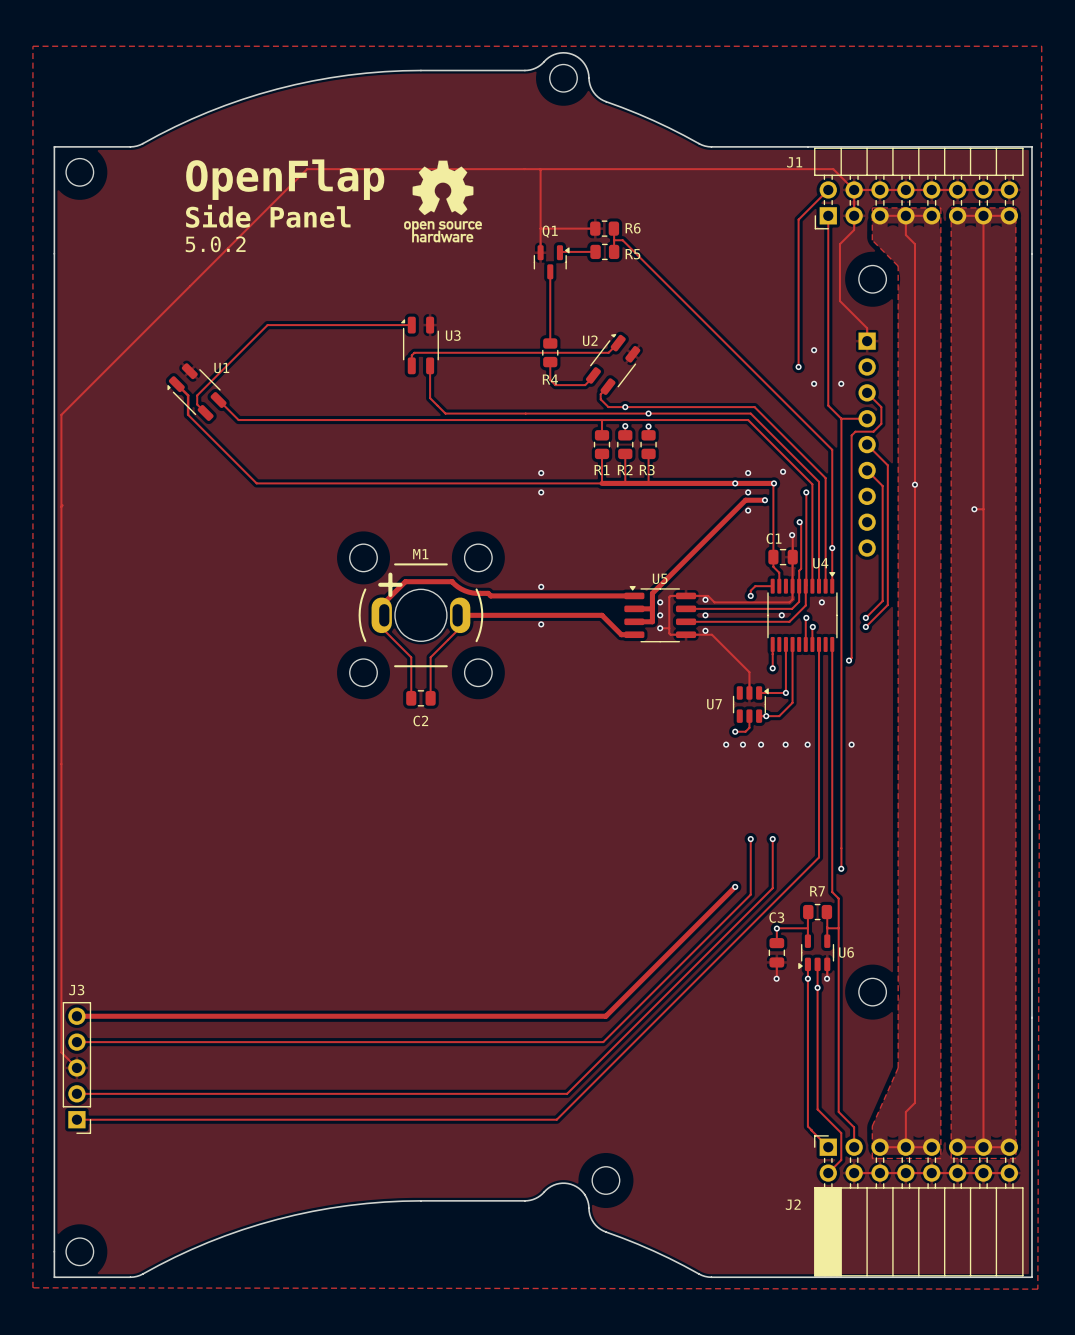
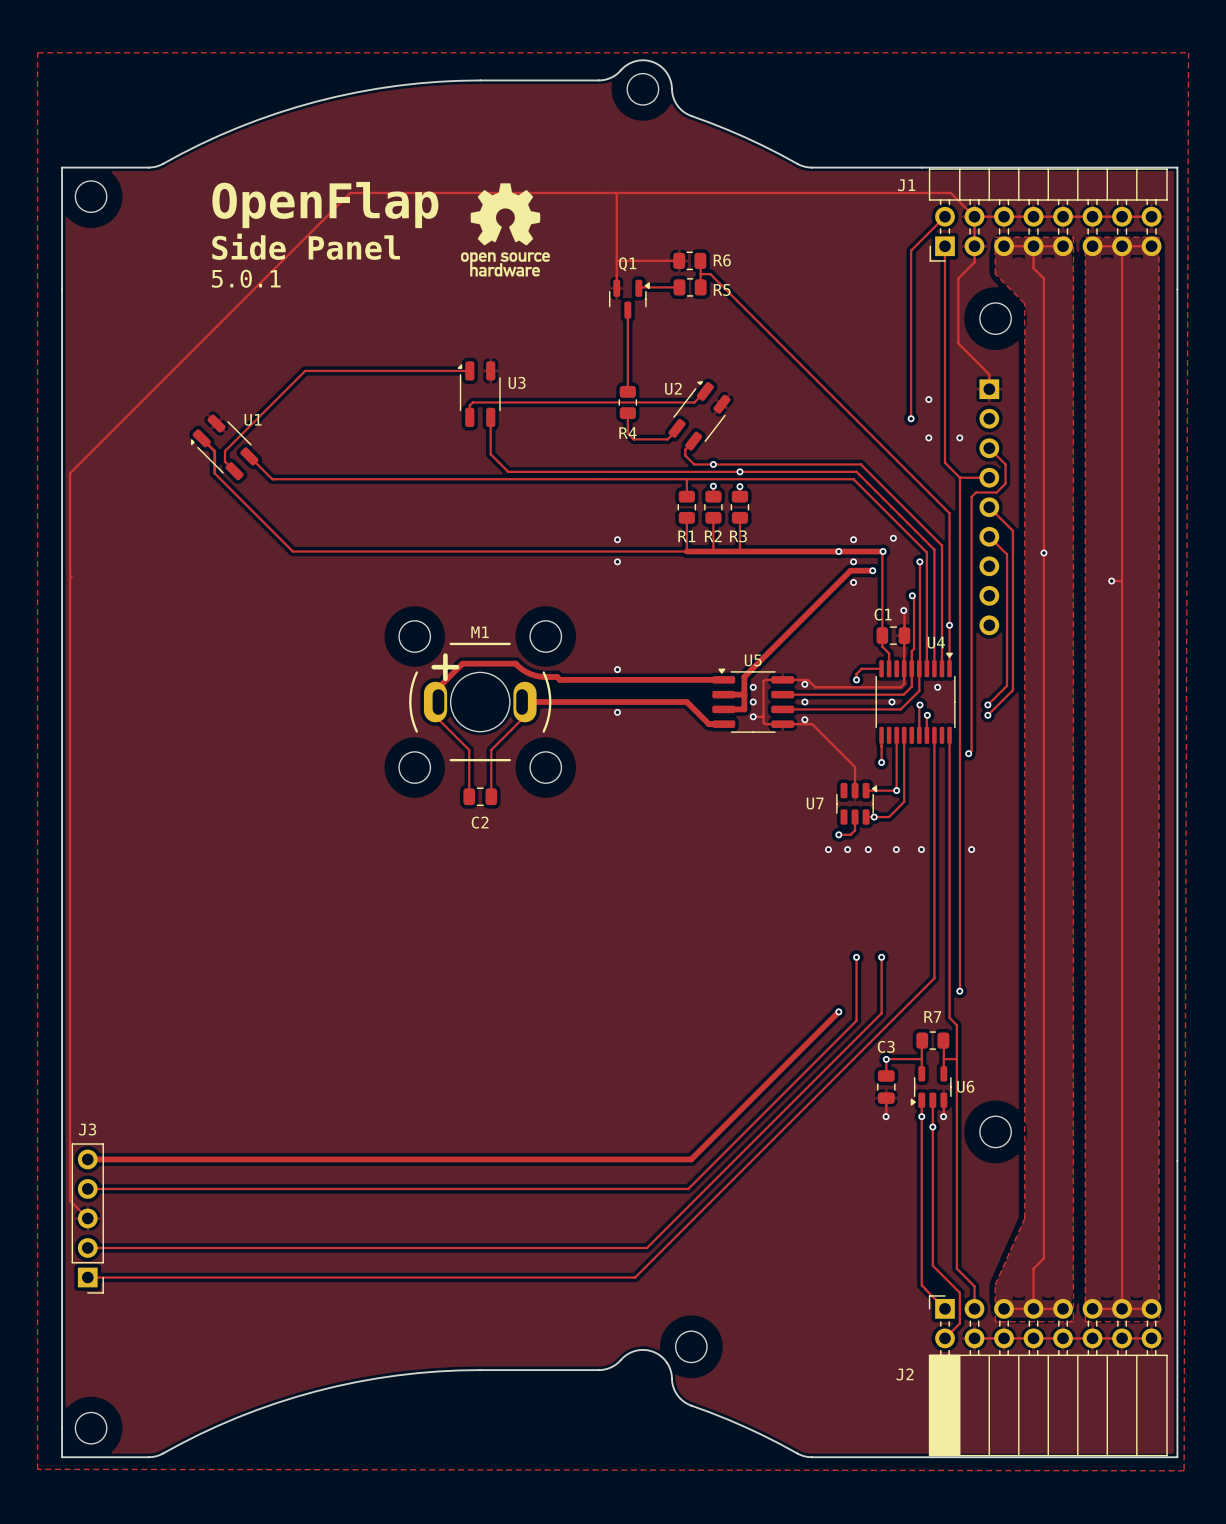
text: 5.0.2 (215, 244) -> 5.0.1 (246, 278)

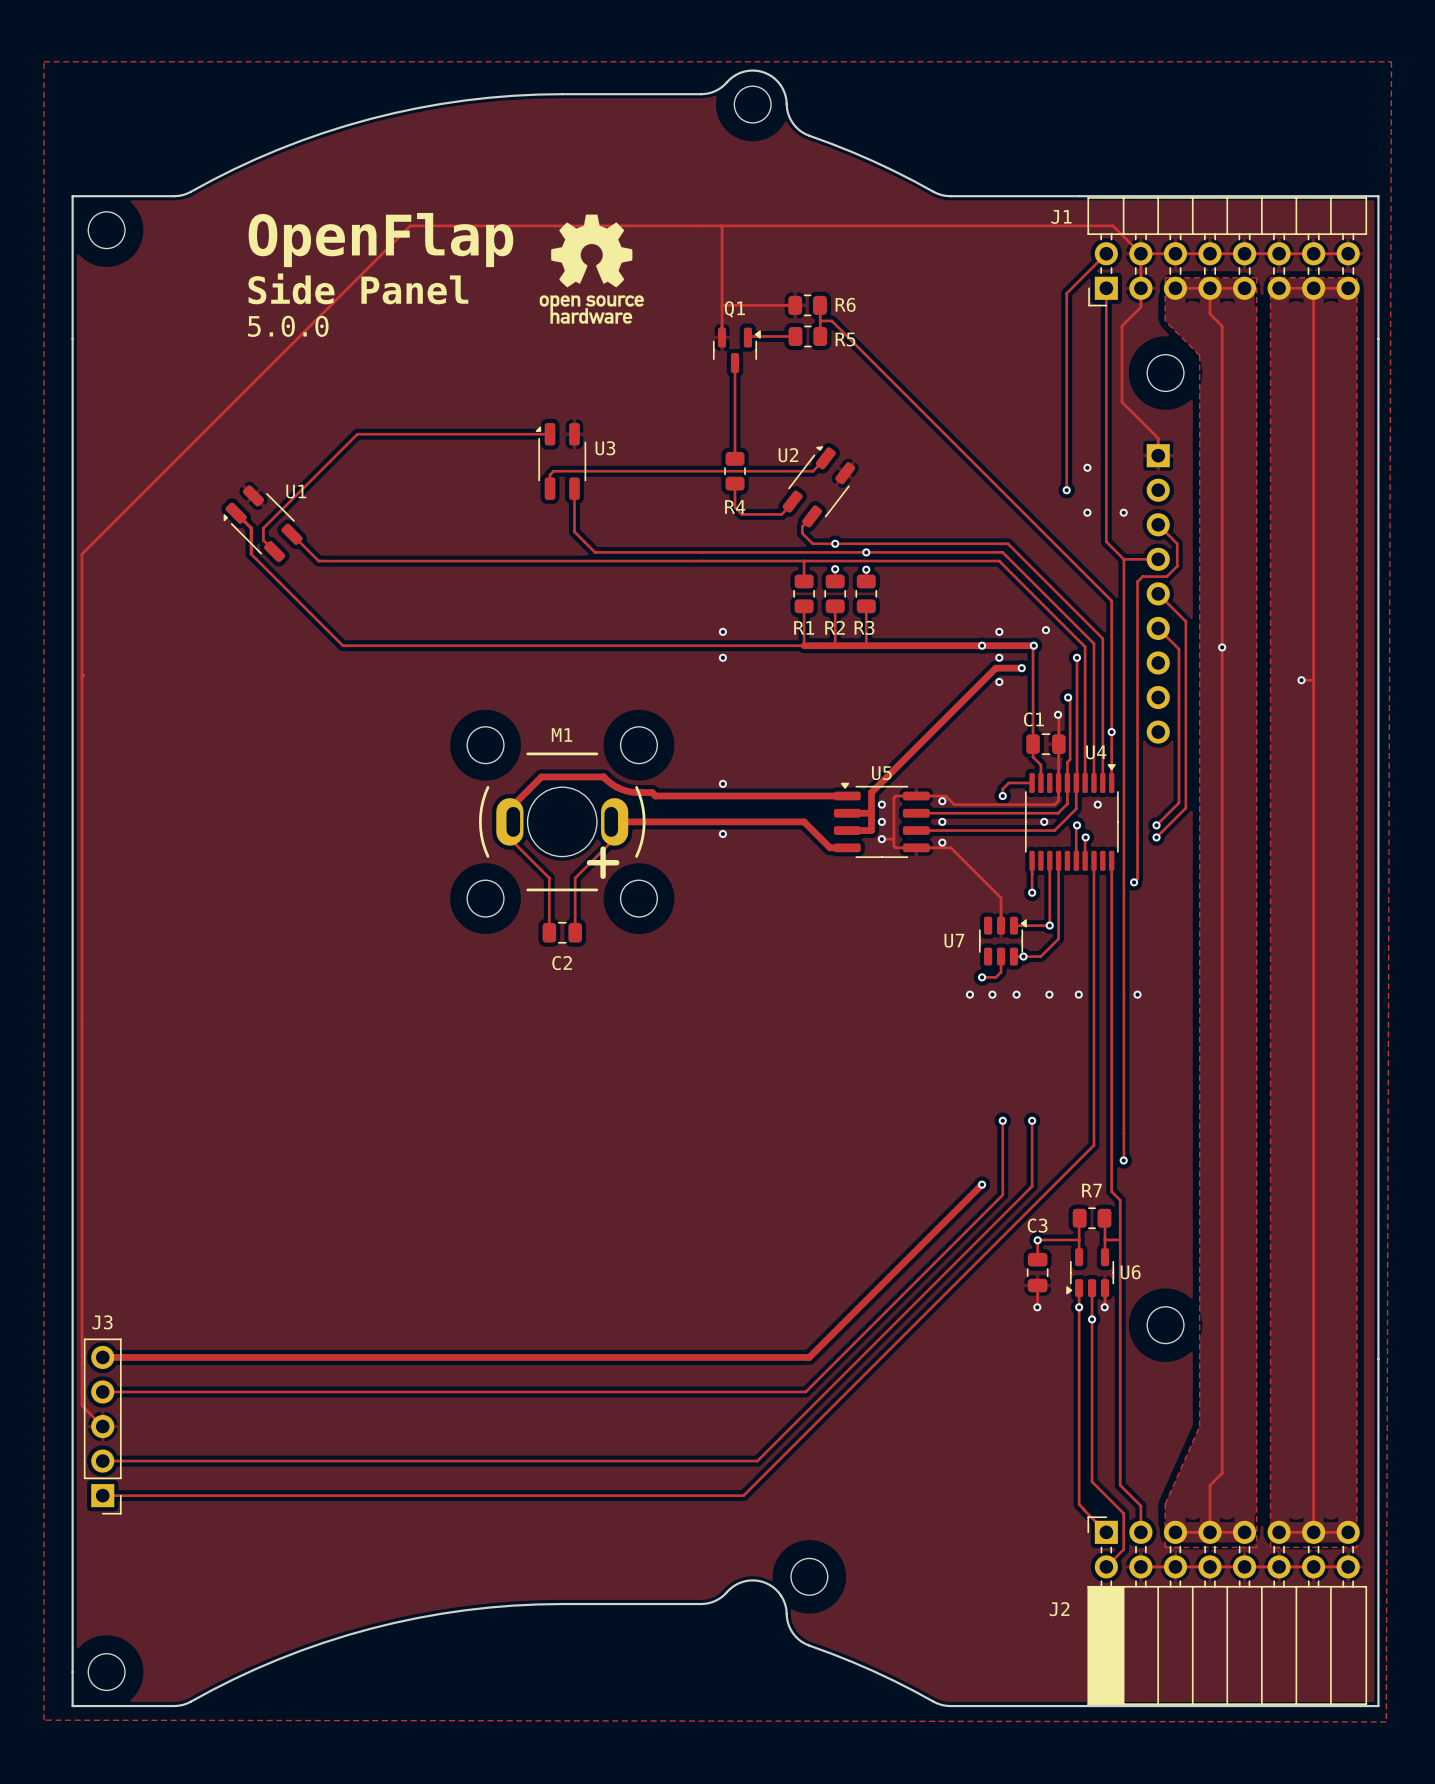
text: 5.0.1 (246, 278) -> 5.0.0 (288, 326)
M1 rotation: 0° (480, 702) -> 180° (562, 821)

